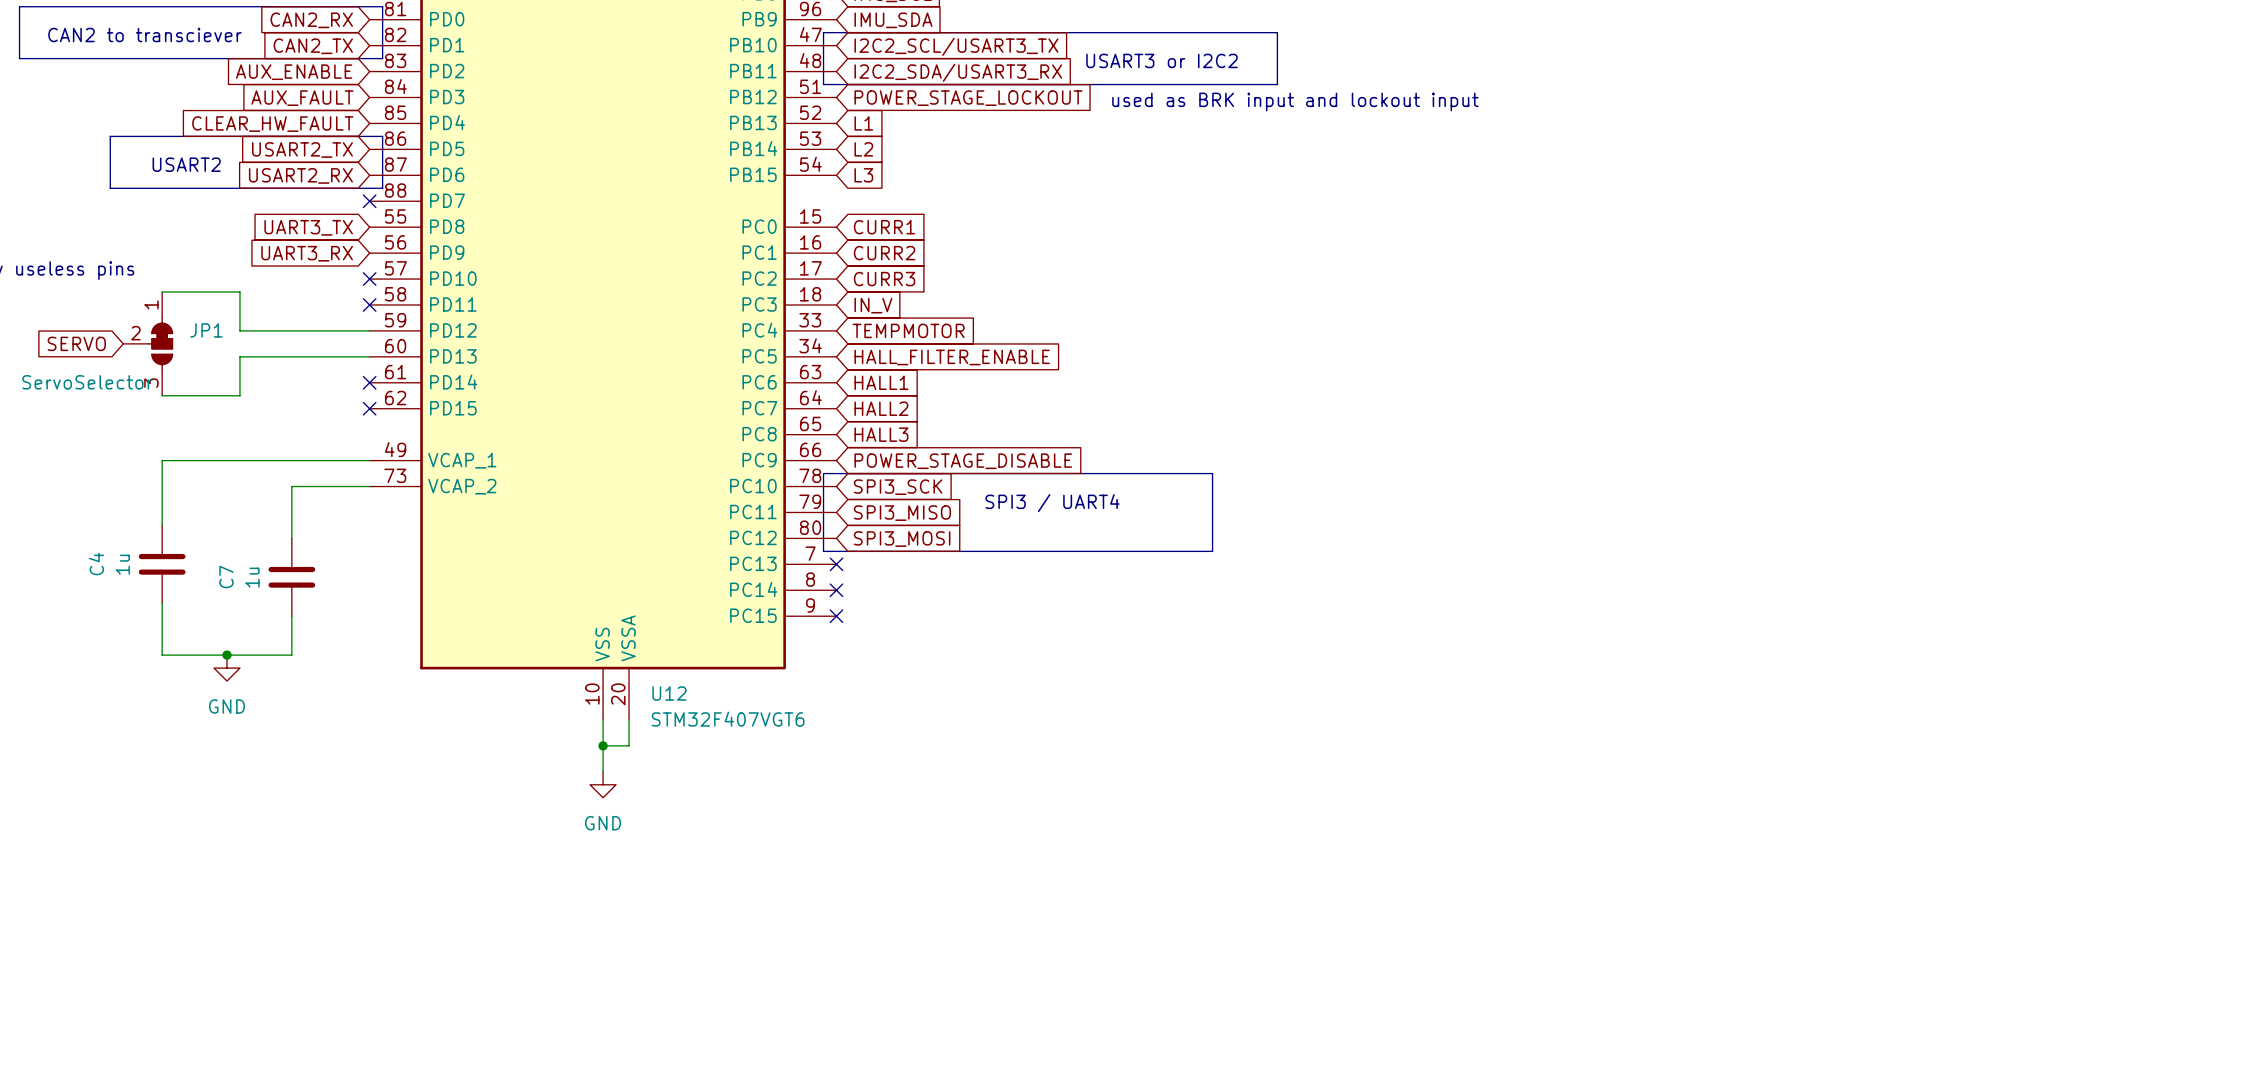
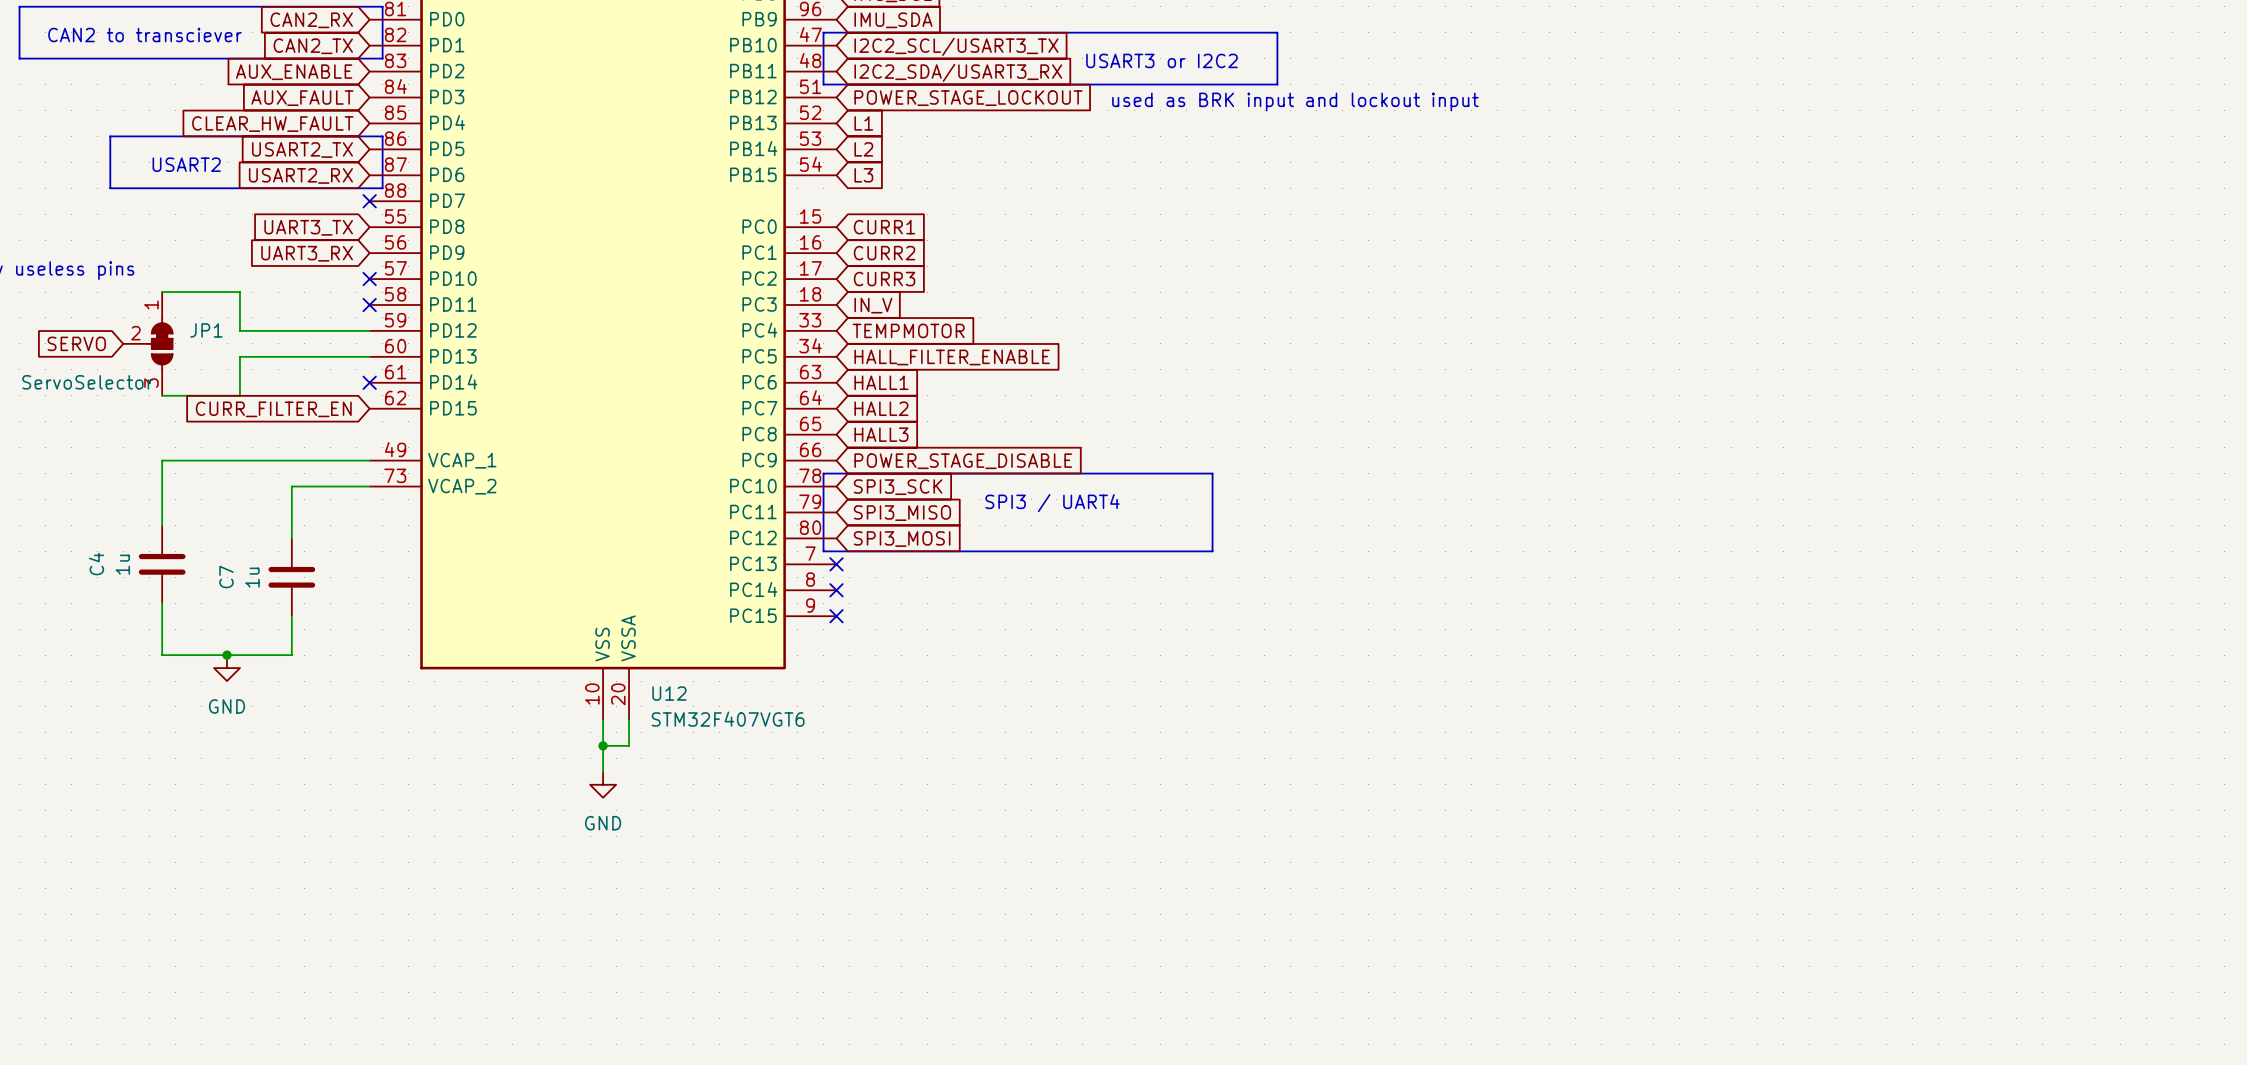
no-connect mark: (369, 408) -> none
global label: none -> CURR_FILTER_EN (273, 409)

